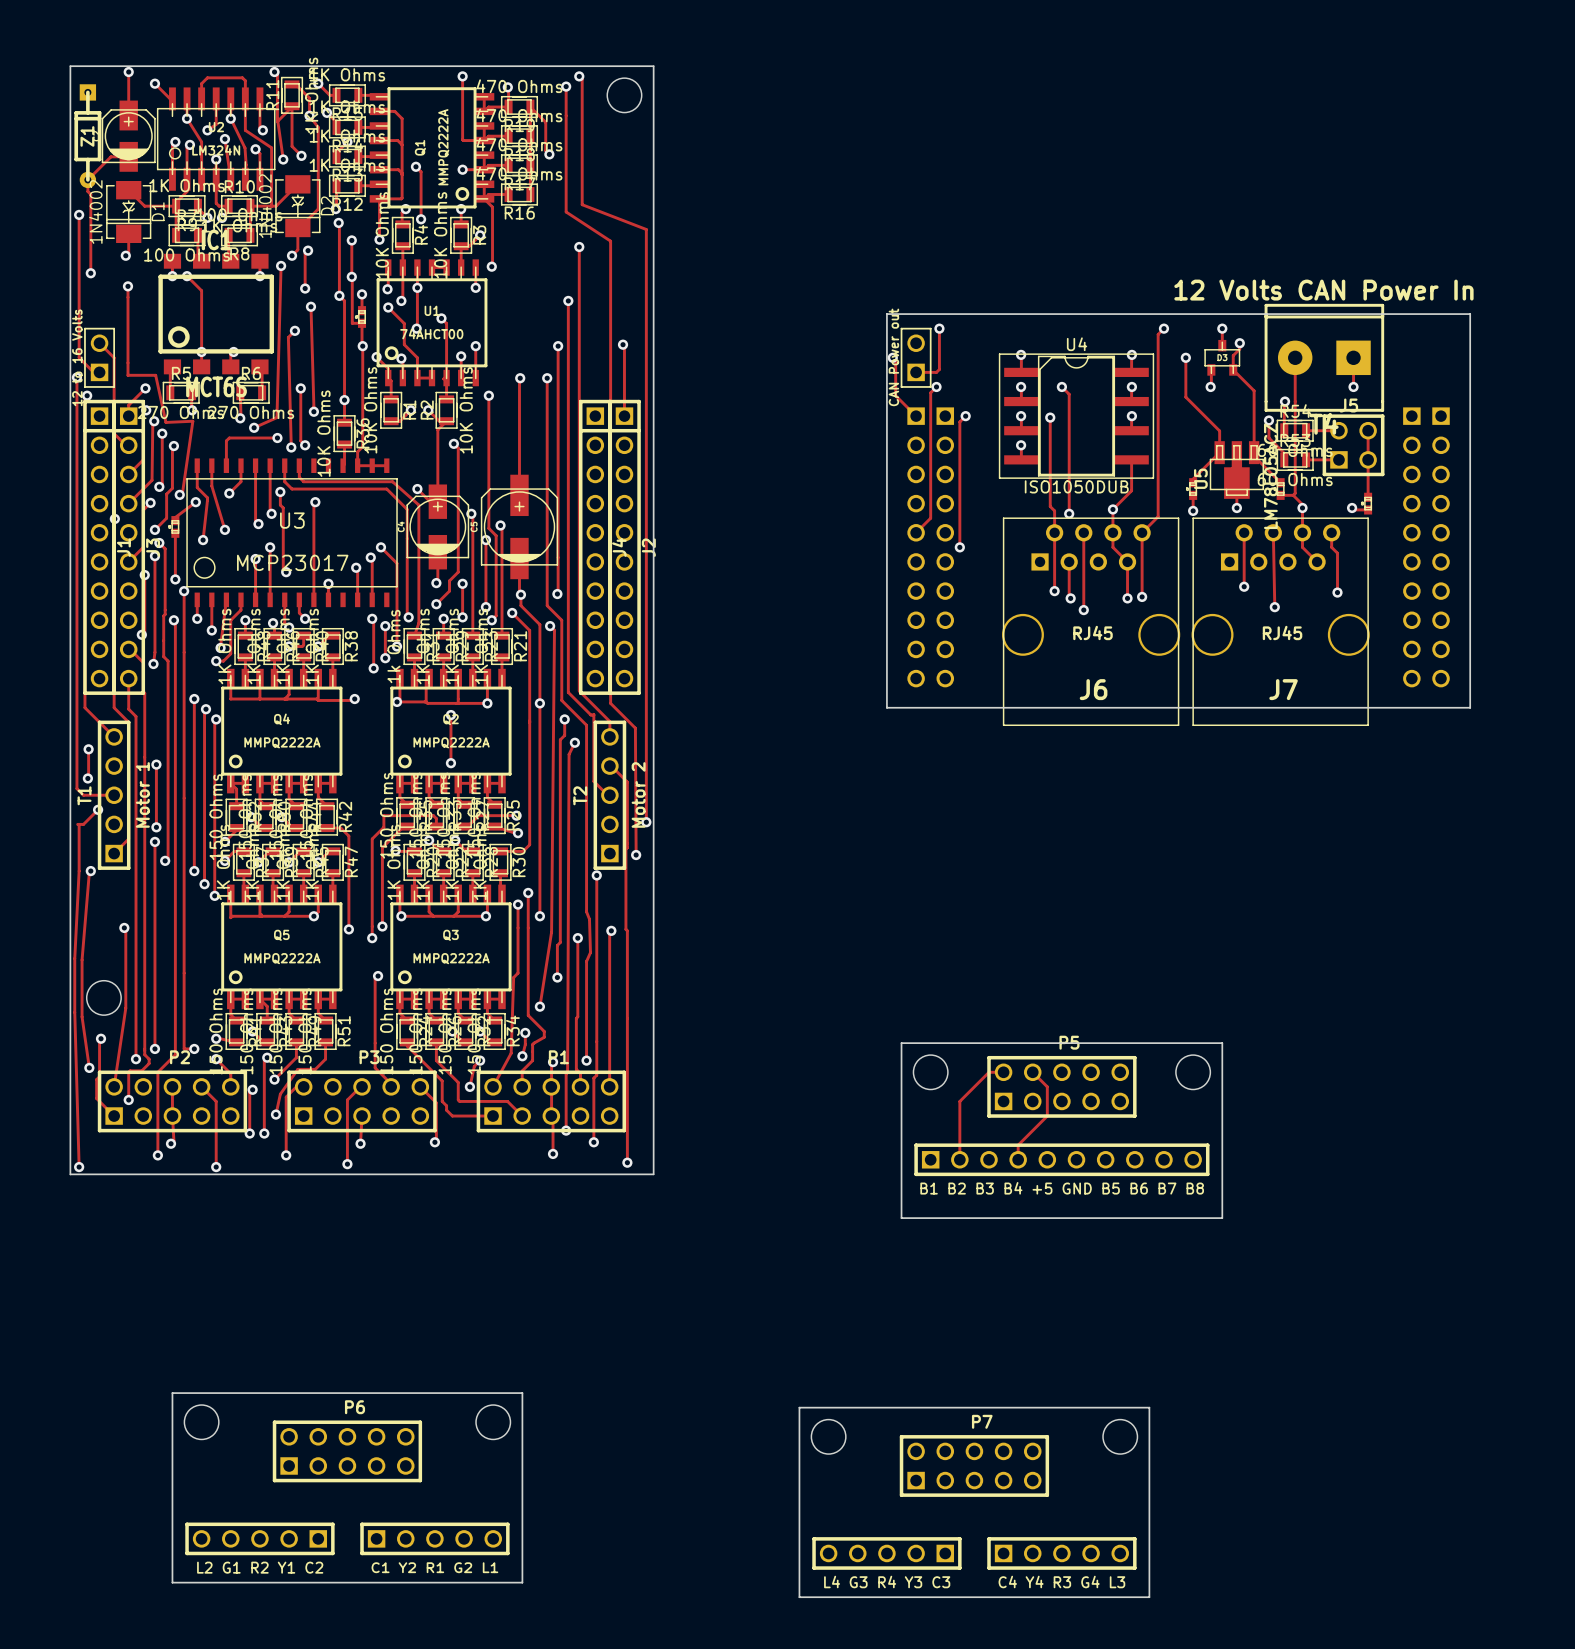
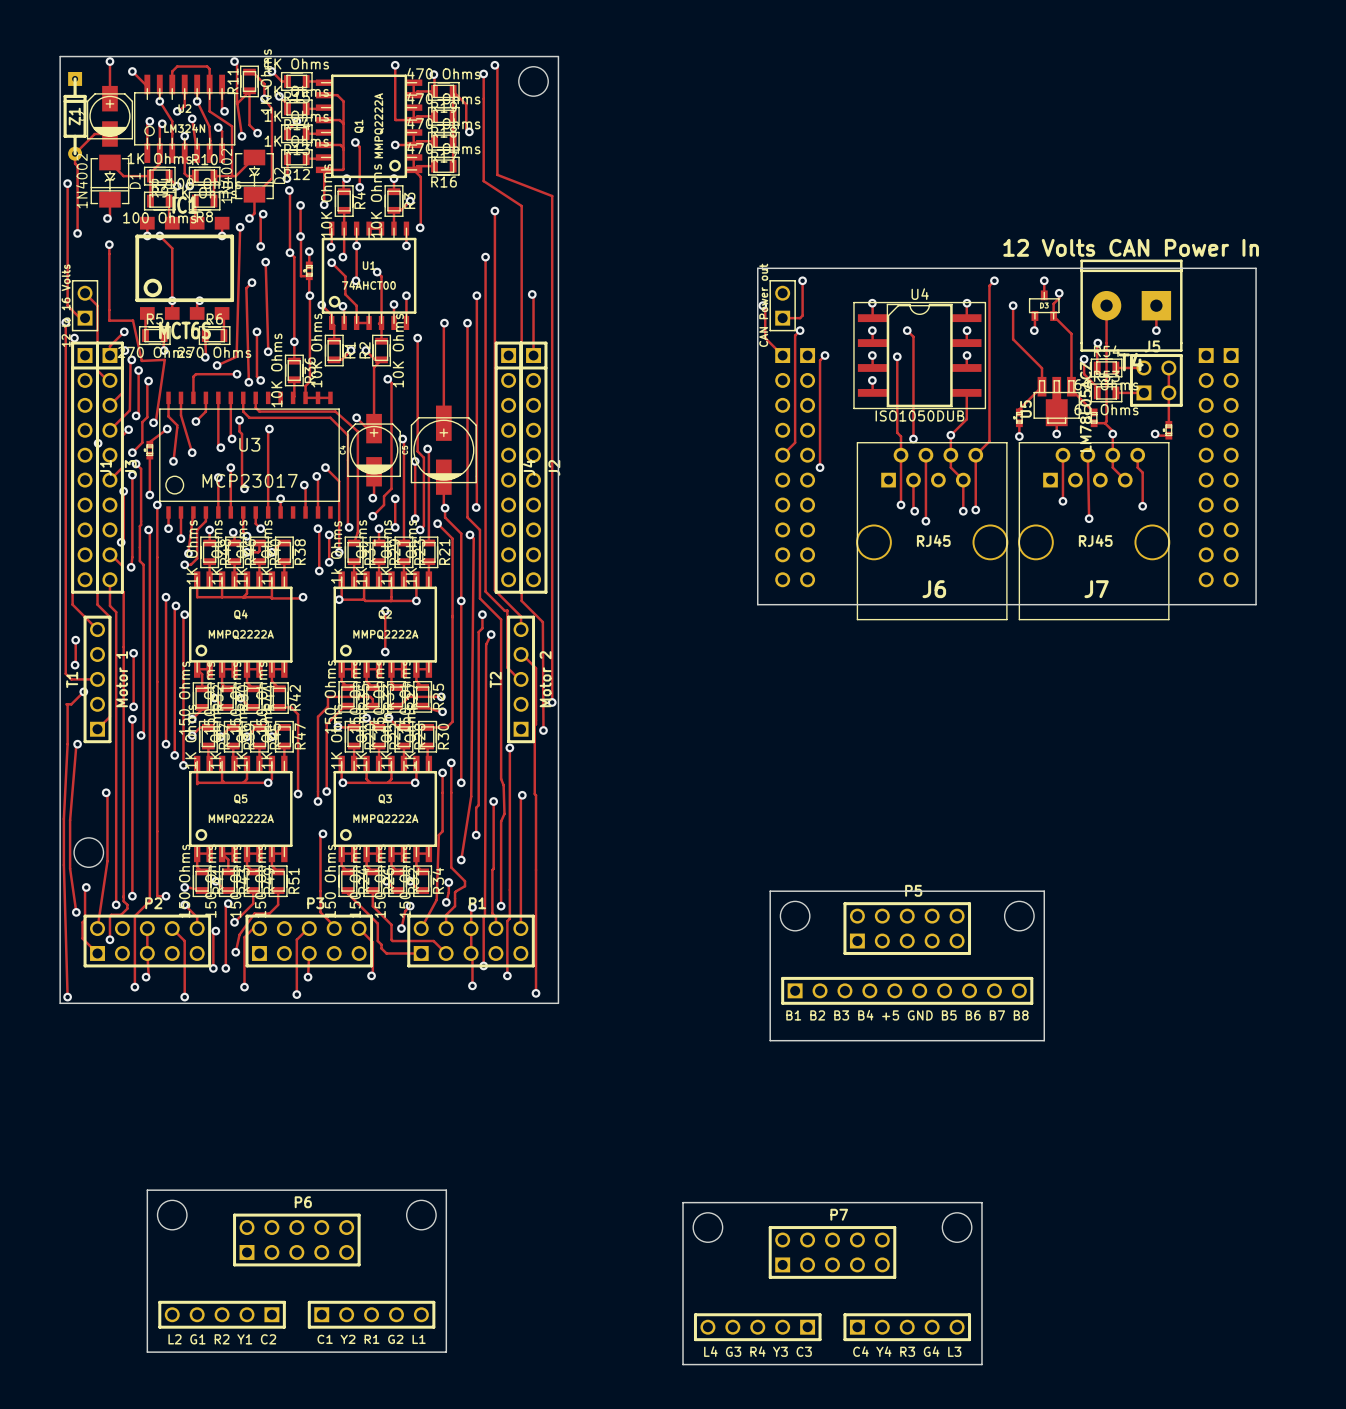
track: (1003, 1072) (989, 1072) (959, 1101) (959, 1159) -> none
track: (1032, 1072) (1047, 1086) (1047, 1116) (1018, 1145) (1018, 1159) -> none

